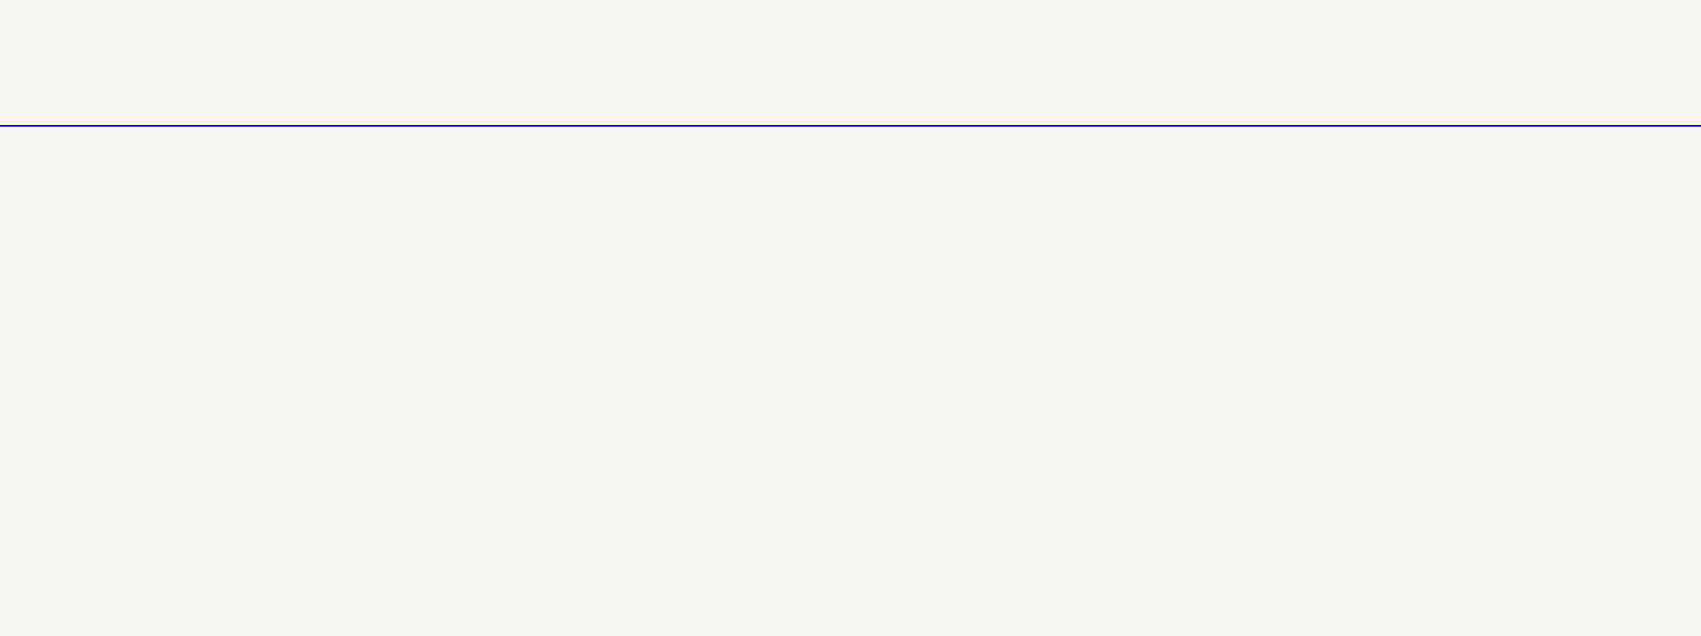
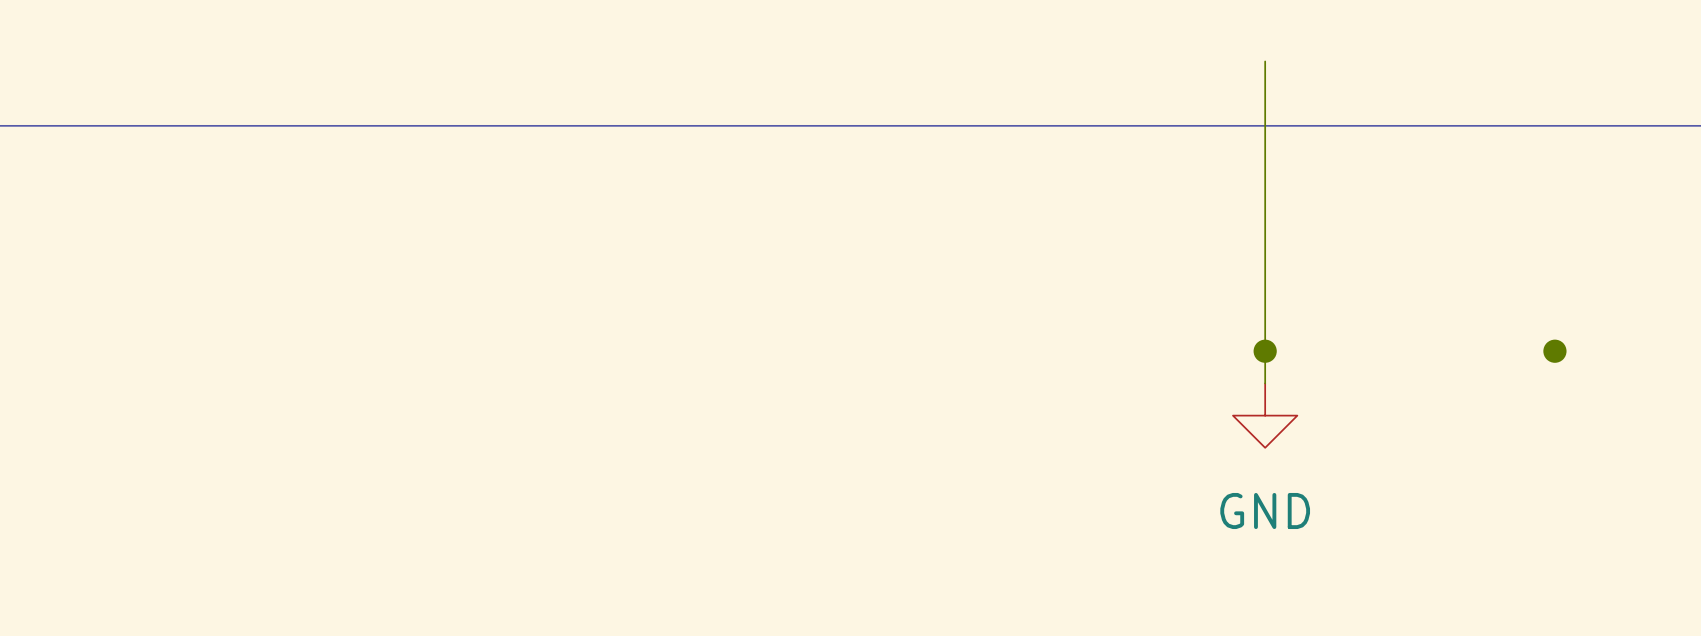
wire: none -> (1265, 61) (1265, 383)
junction: none -> (1265, 351)
junction: none -> (1554, 351)
power symbol: none -> GND (1265, 415)

